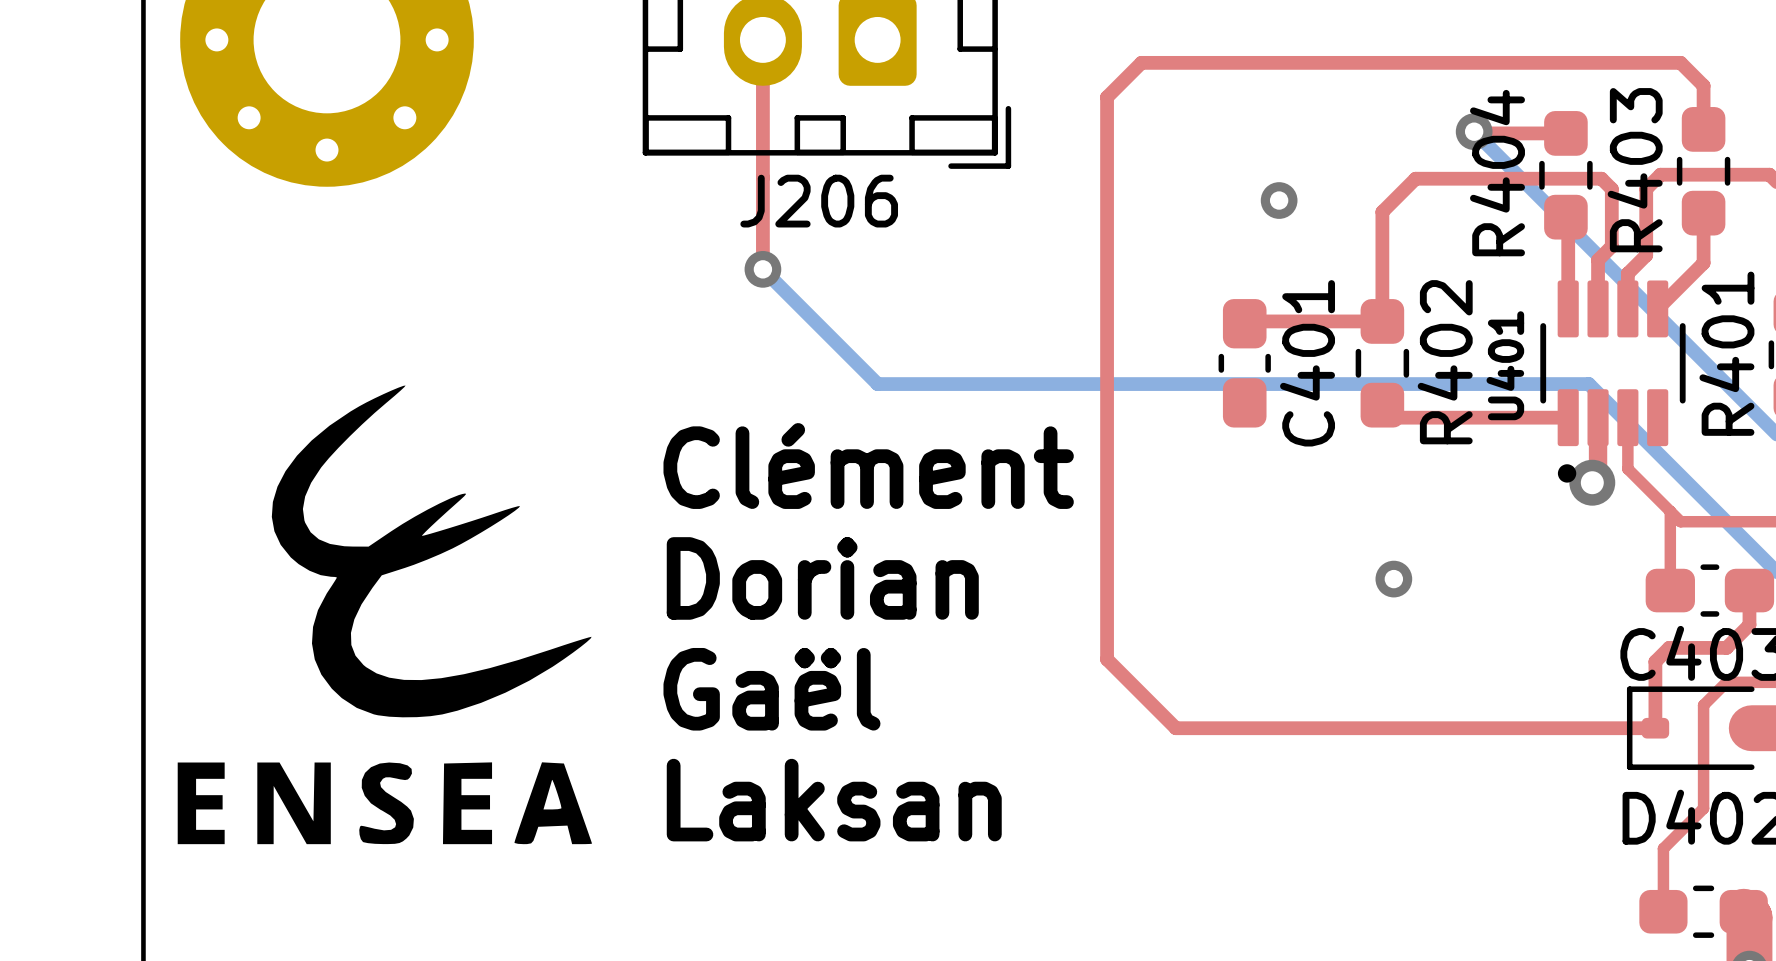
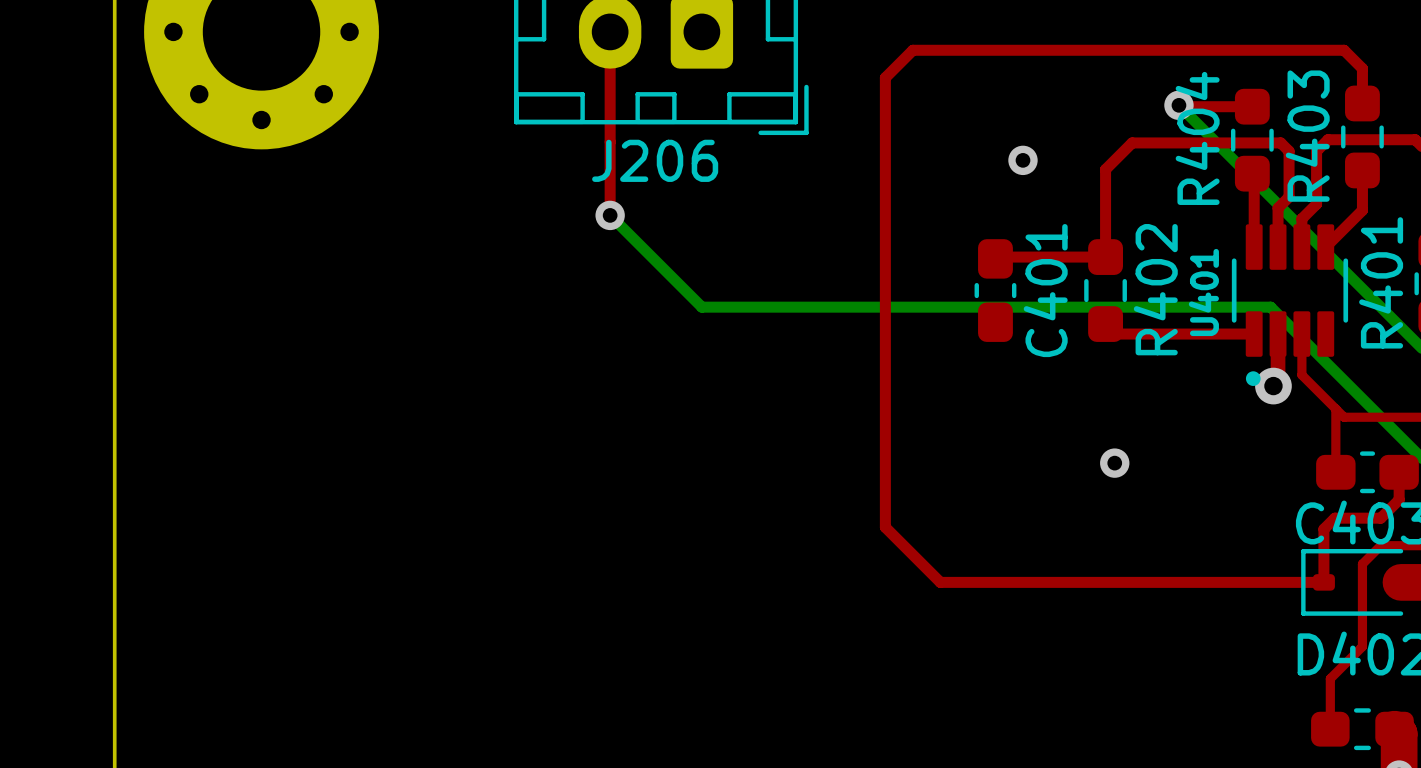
drawing: [177, 385, 593, 845] -> none
text: Clément (868, 466) -> none
text: Dorian (822, 578) -> none
text: Gaël (771, 689) -> none
text: Laksan (834, 800) -> none

